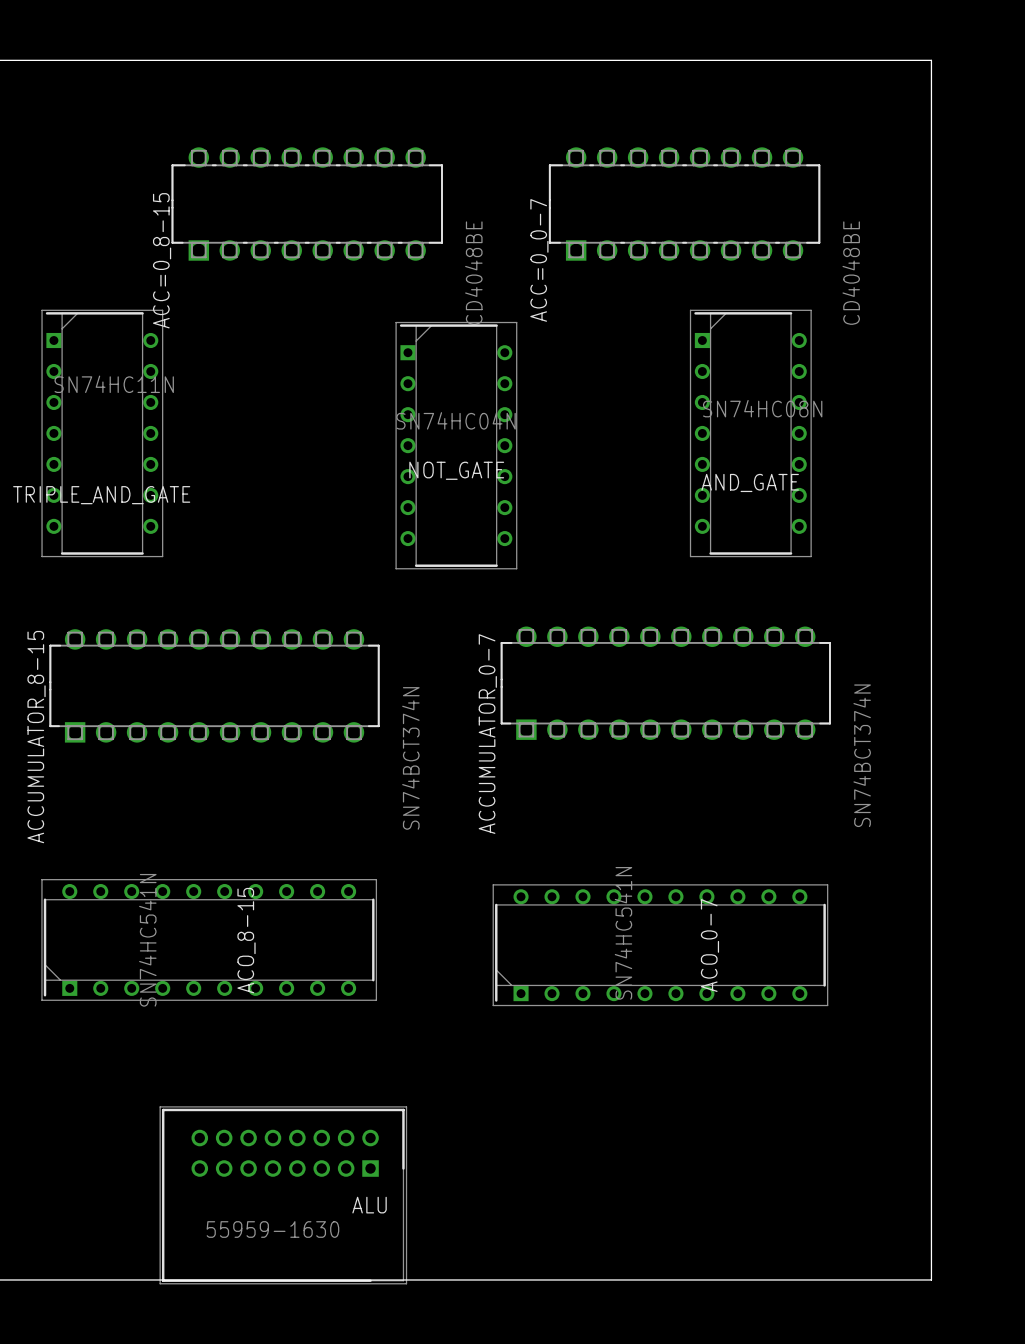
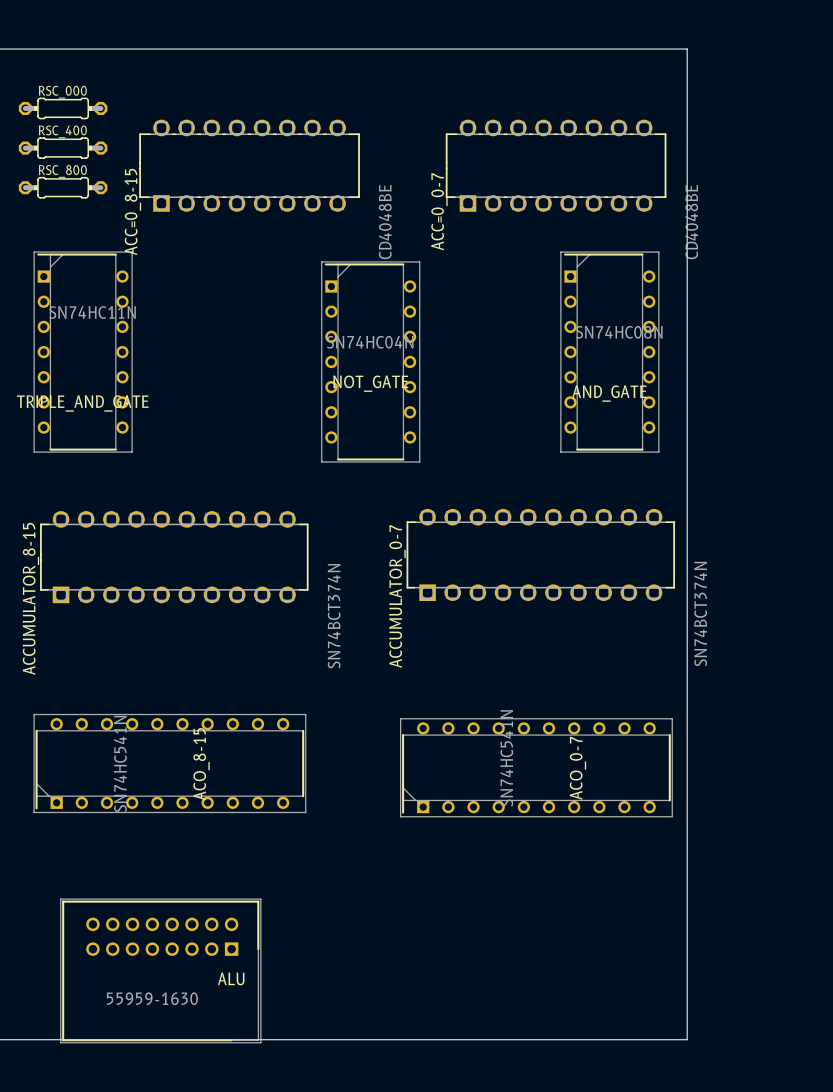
board edge: (846, 60) (931, 60) (931, 1279) (846, 1279) -> (687, 49) (687, 1039)
RSC_000: none -> (63, 108)
RSC_400: none -> (63, 148)
RSC_800: none -> (63, 187)
ALU position: (283, 1195) -> (160, 970)

